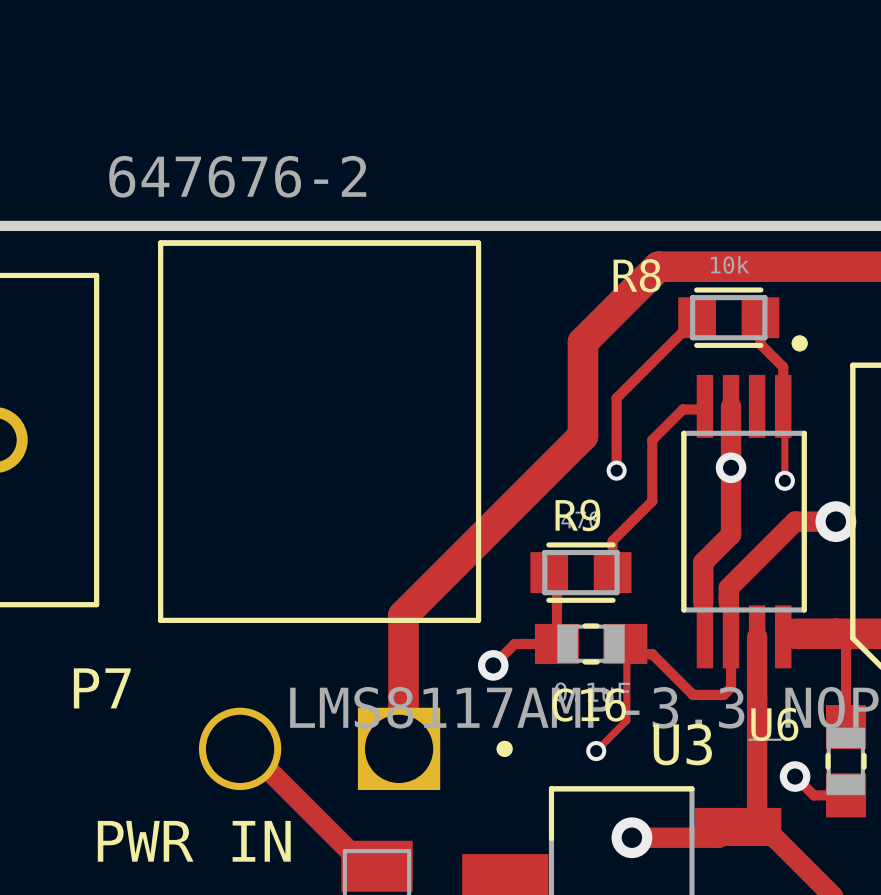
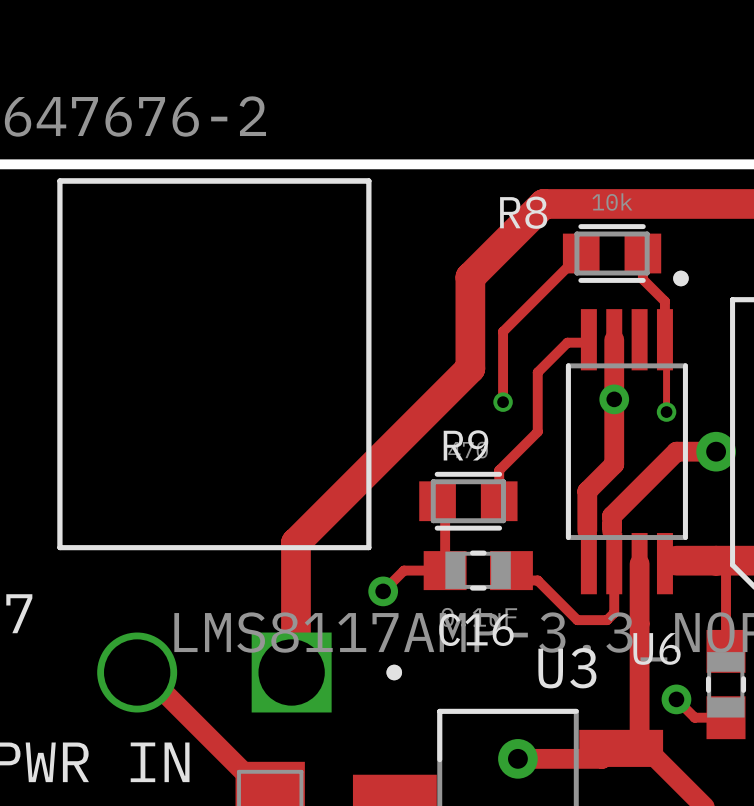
track: (626, 643) (626, 720) (596, 751) -> none
via: (596, 751) -> none

